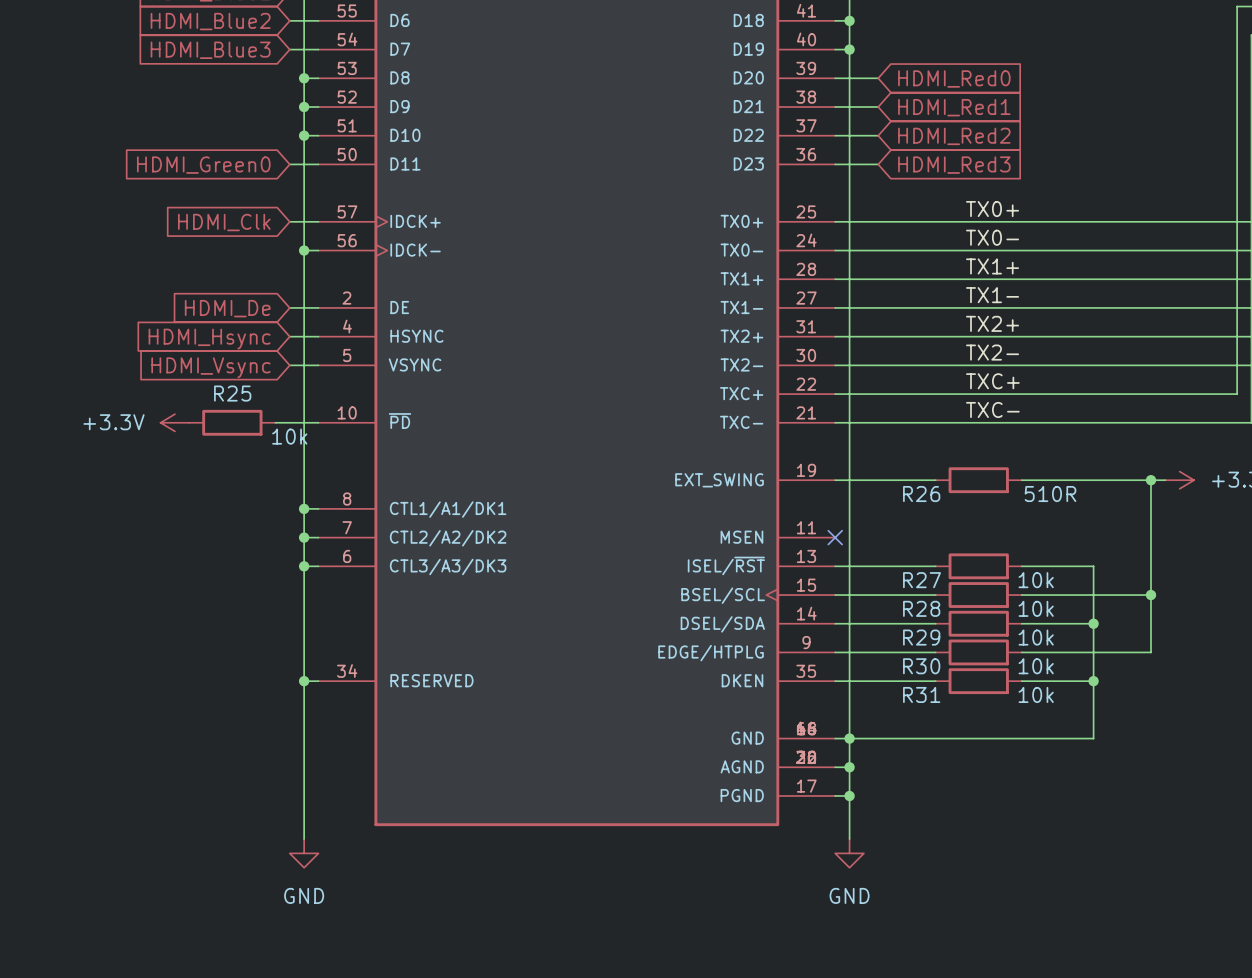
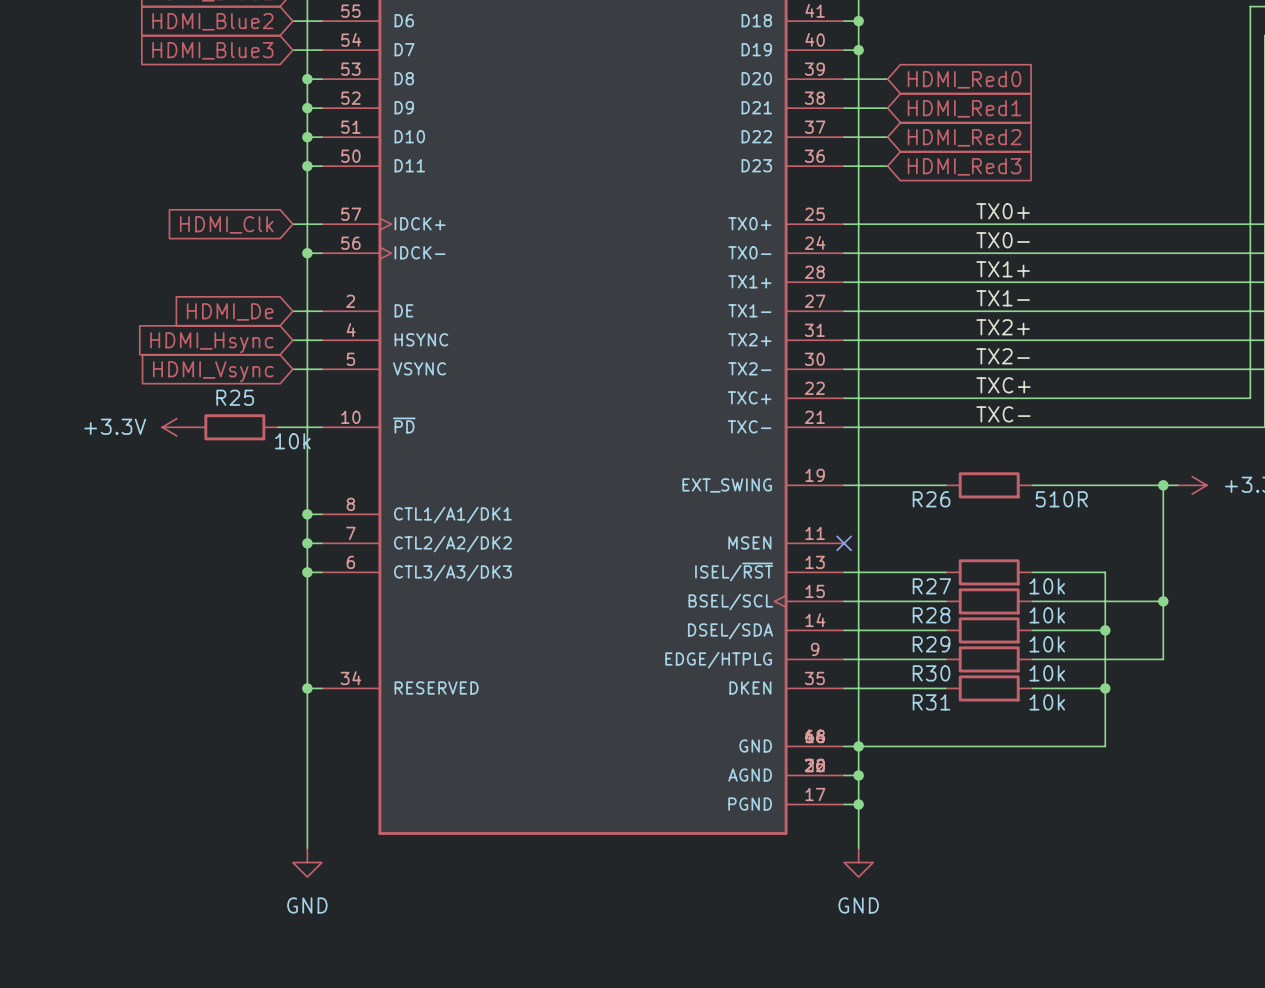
wire: (289, 164) (304, 164) -> none
junction: none -> (307, 166)
global label: HDMI_Green0 (203, 165) -> none

